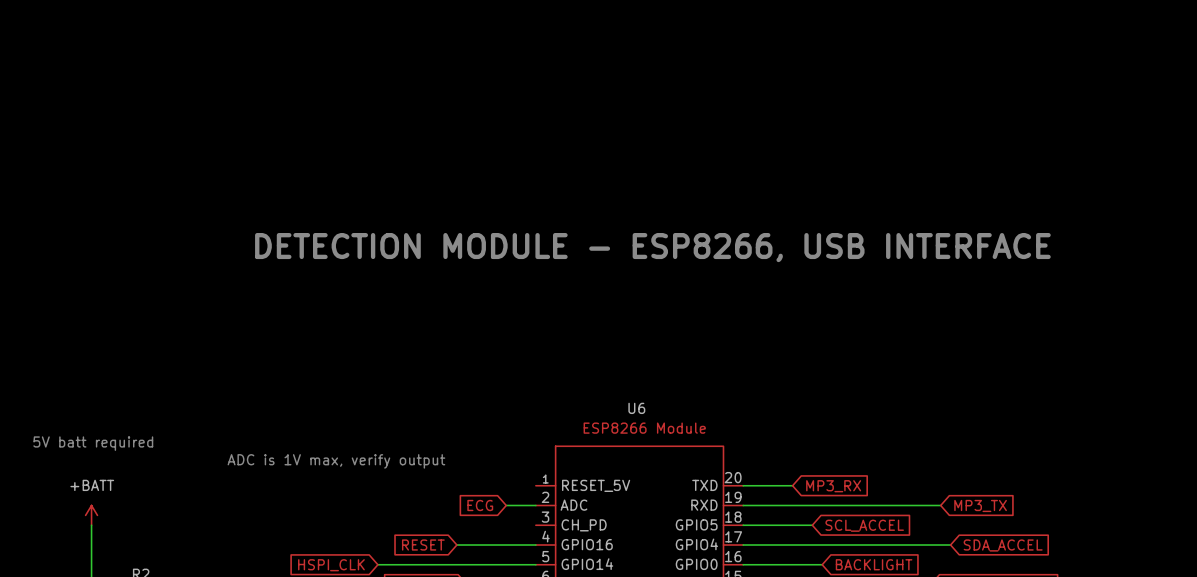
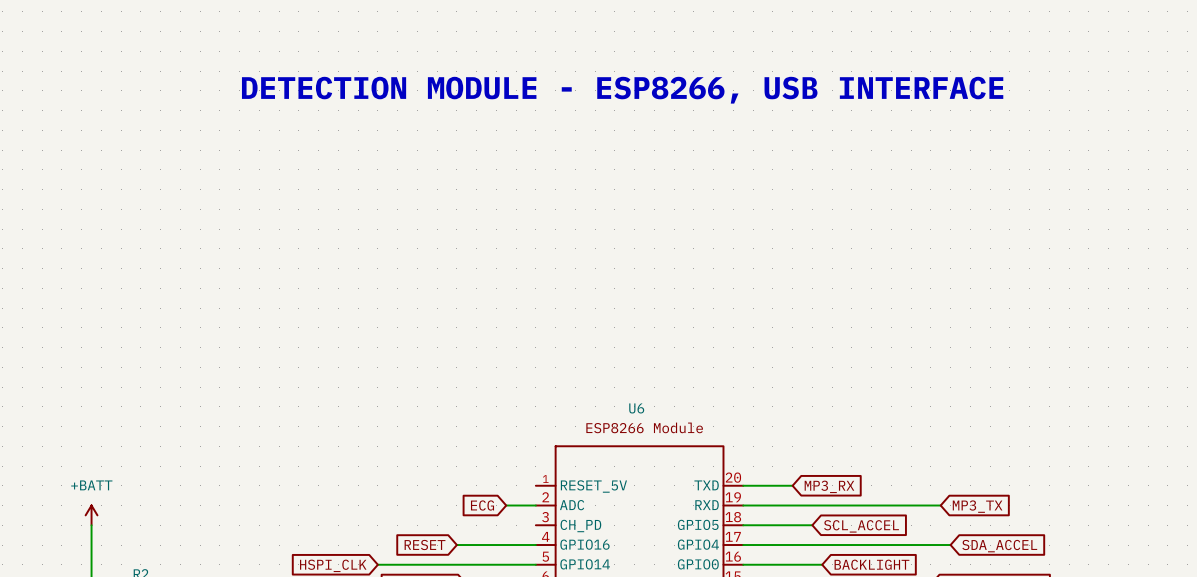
text position: DETECTION MODULE - ESP8266, USB INTERFACE (652, 247) -> DETECTION MODULE - ESP8266, USB INTERFACE (622, 90)
text: 5V batt required (93, 443) -> none
text: ADC is 1V max, verify output (336, 461) -> none

